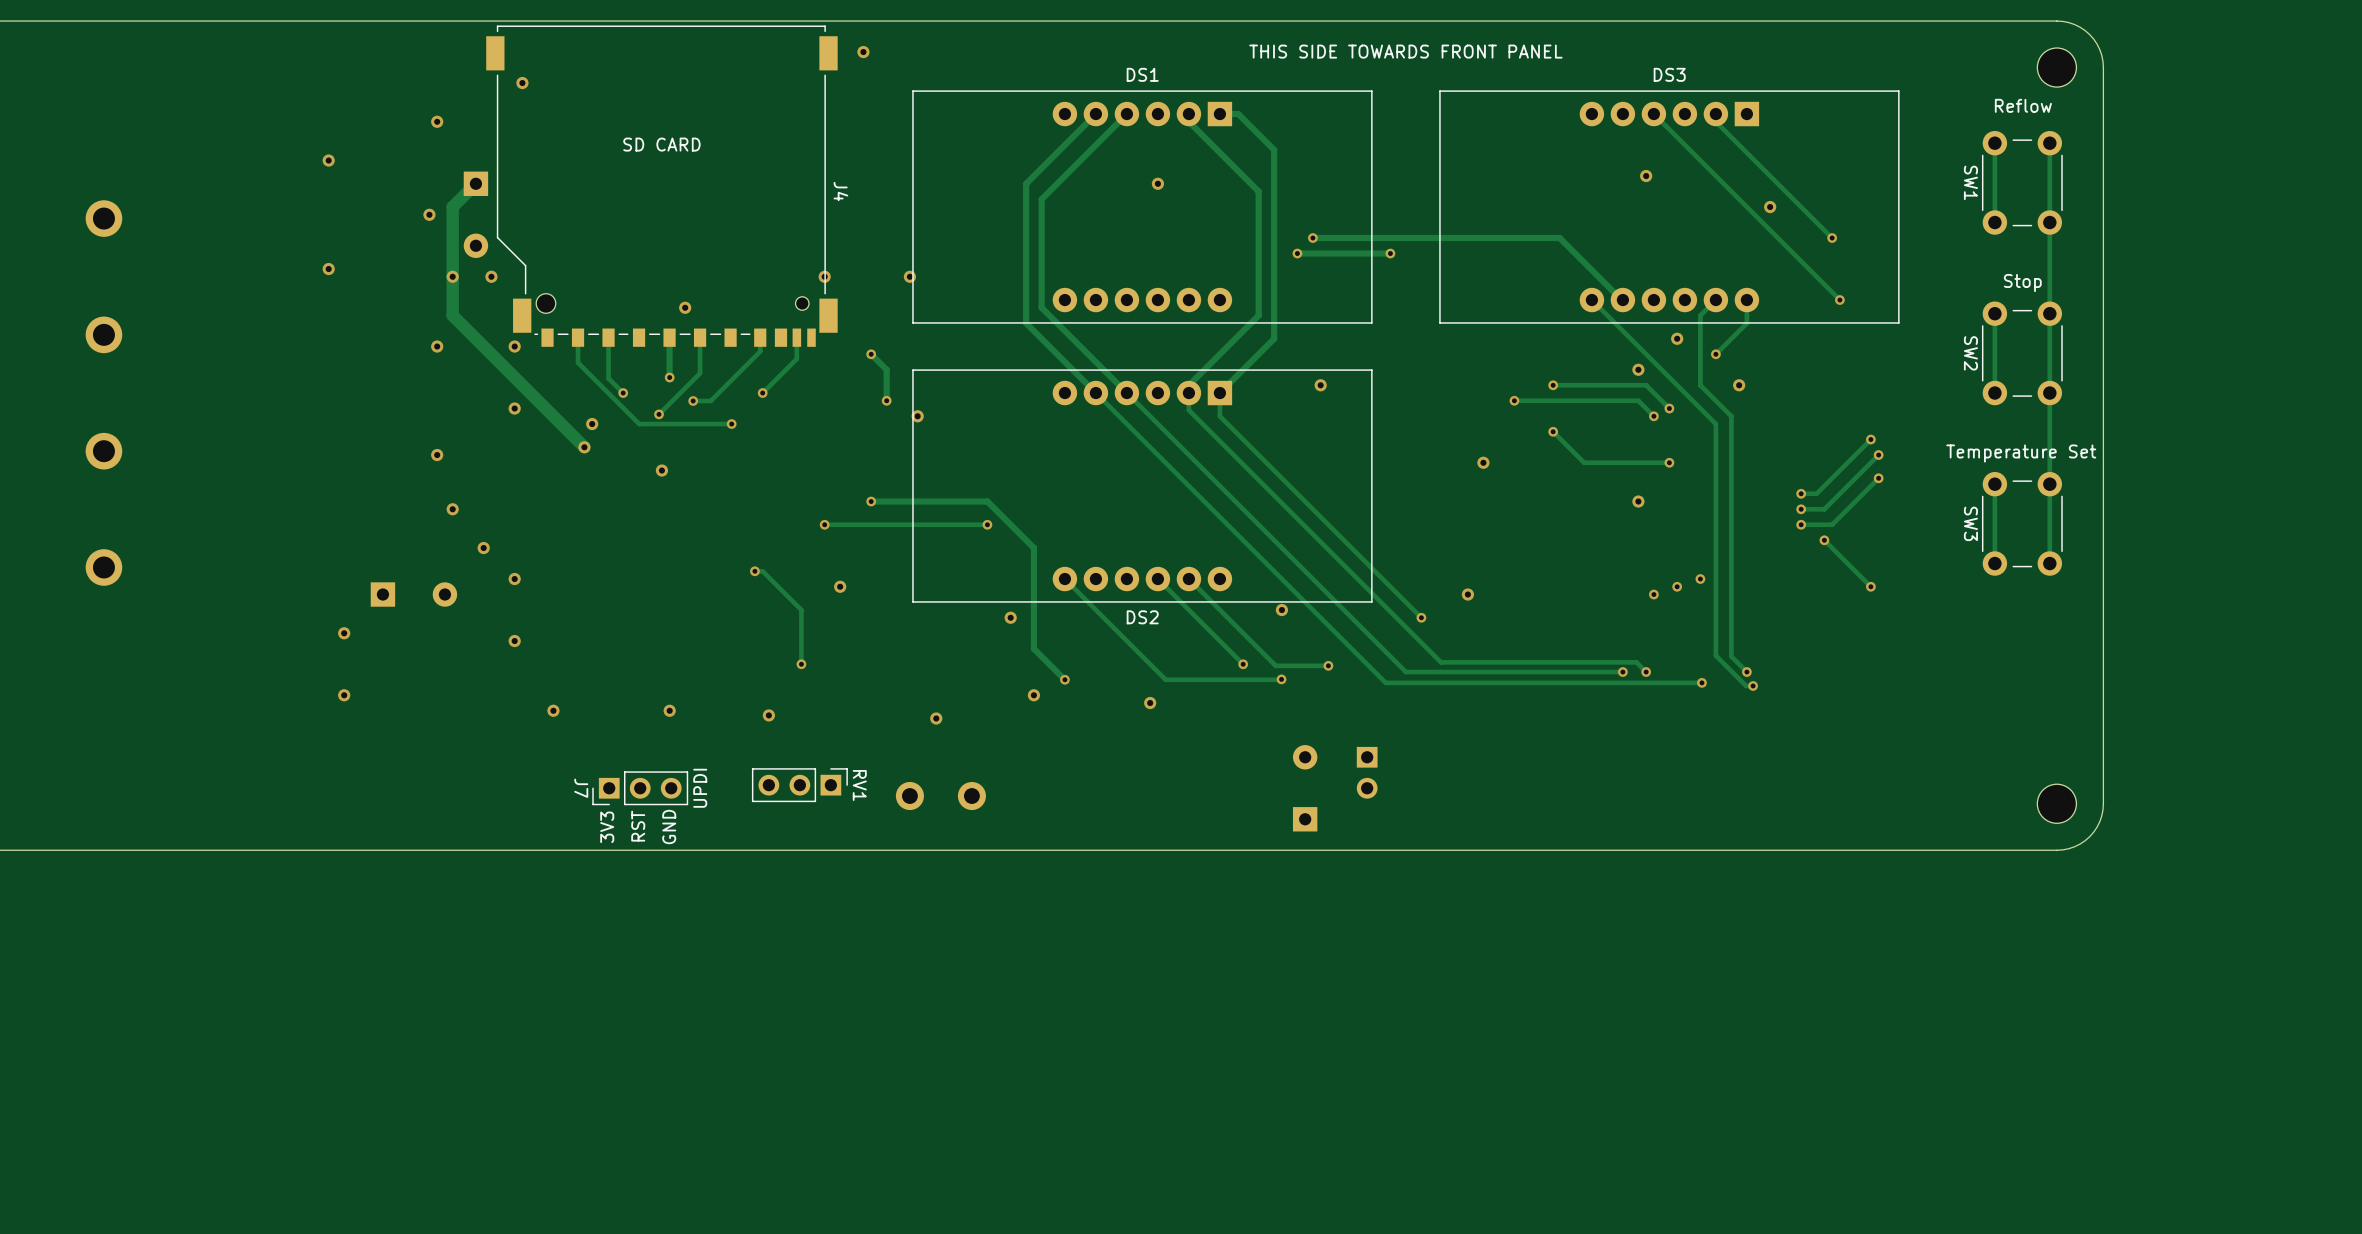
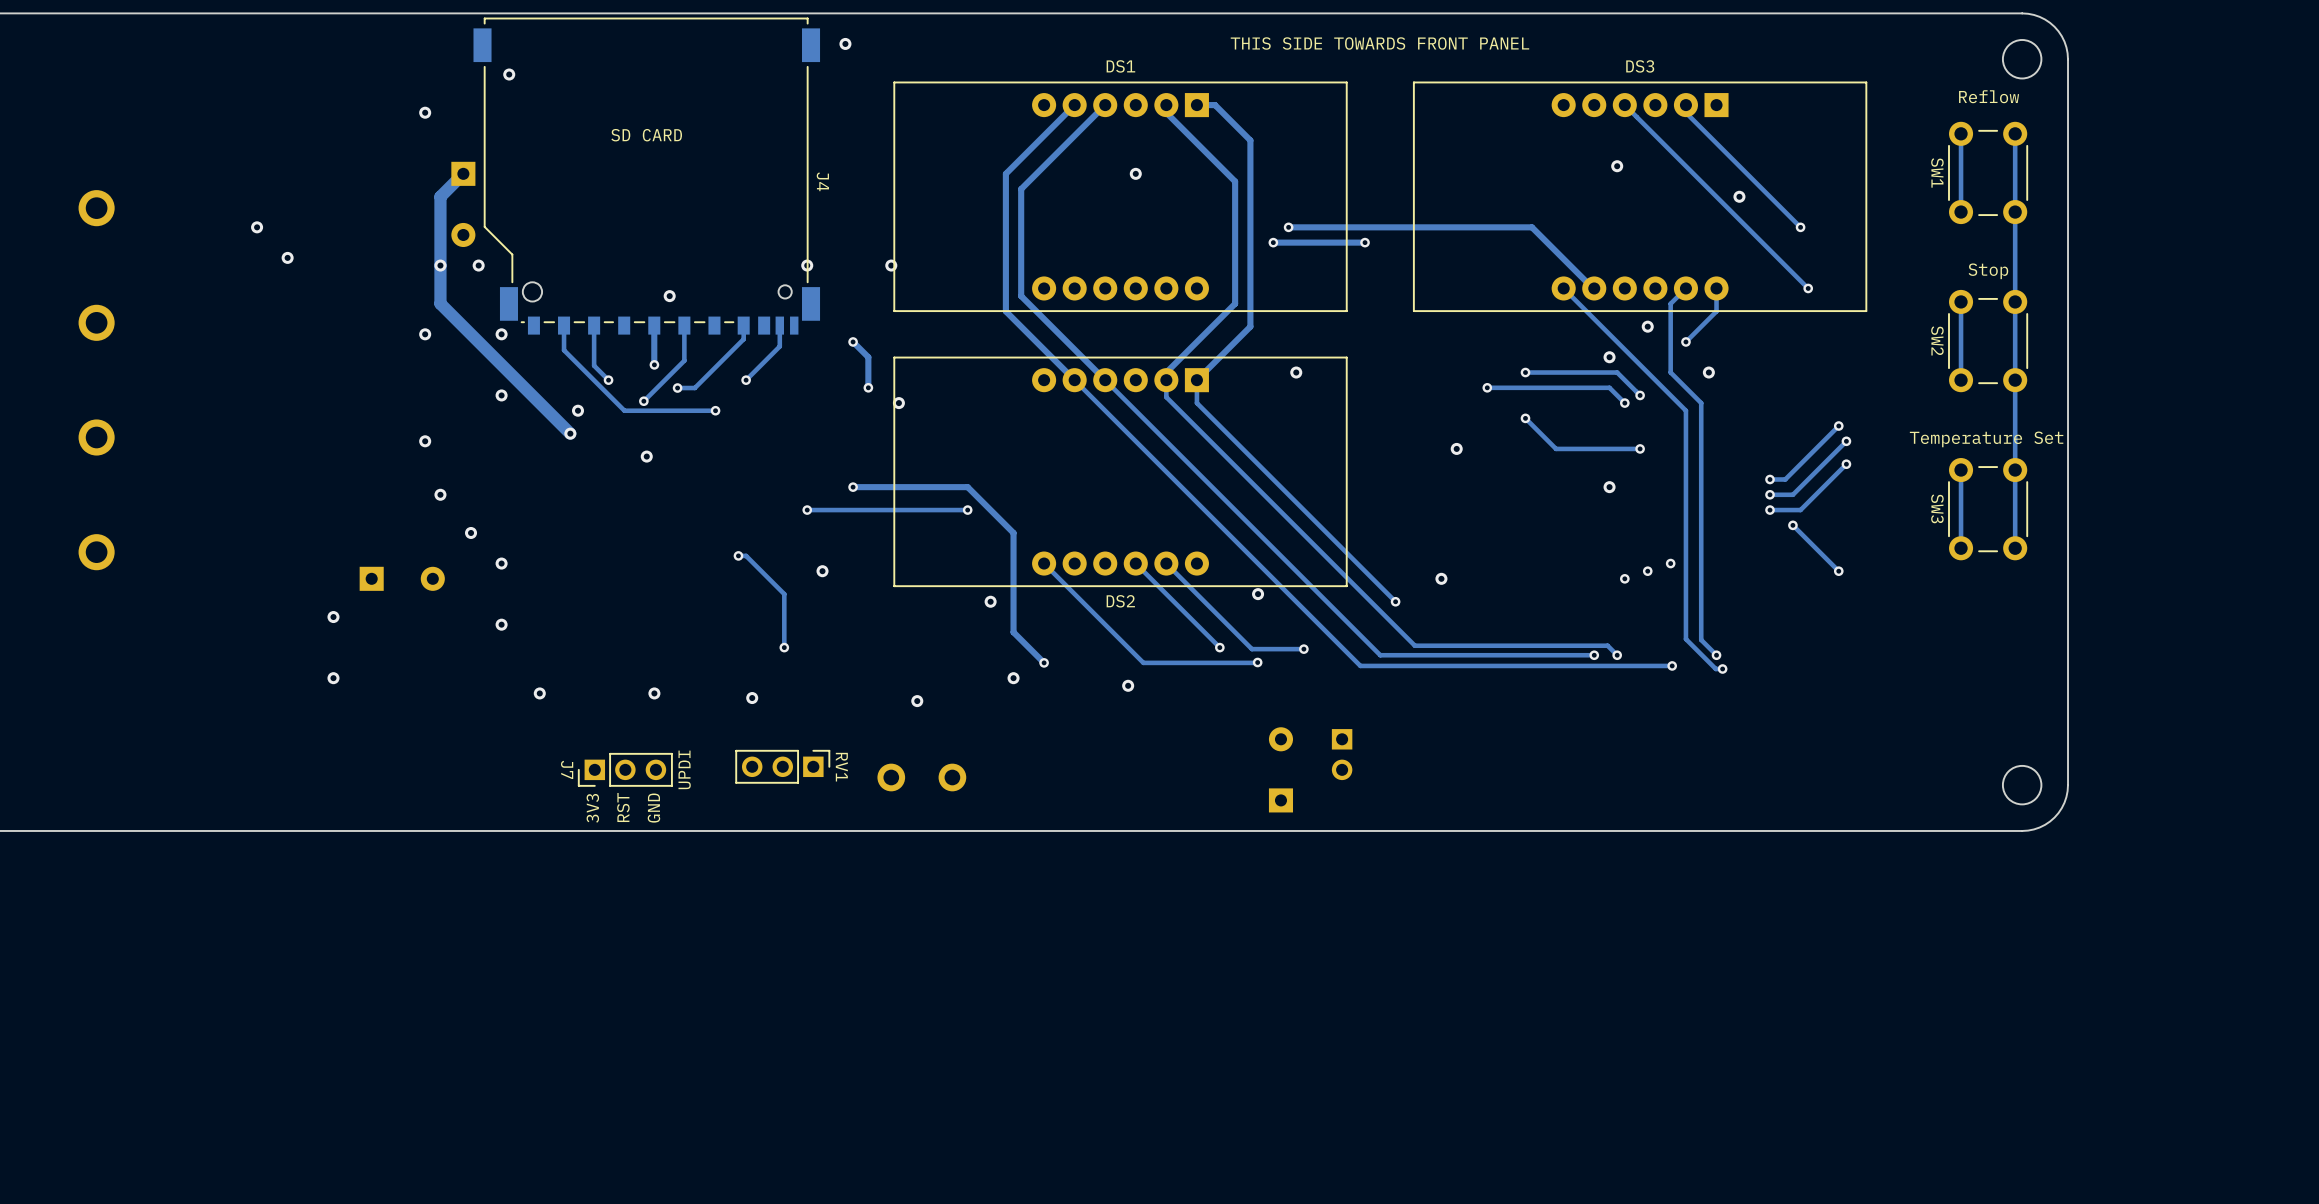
via: (328, 160) -> none
via: (429, 214) -> none
via: none -> (257, 227)
via position: (328, 269) -> (287, 257)

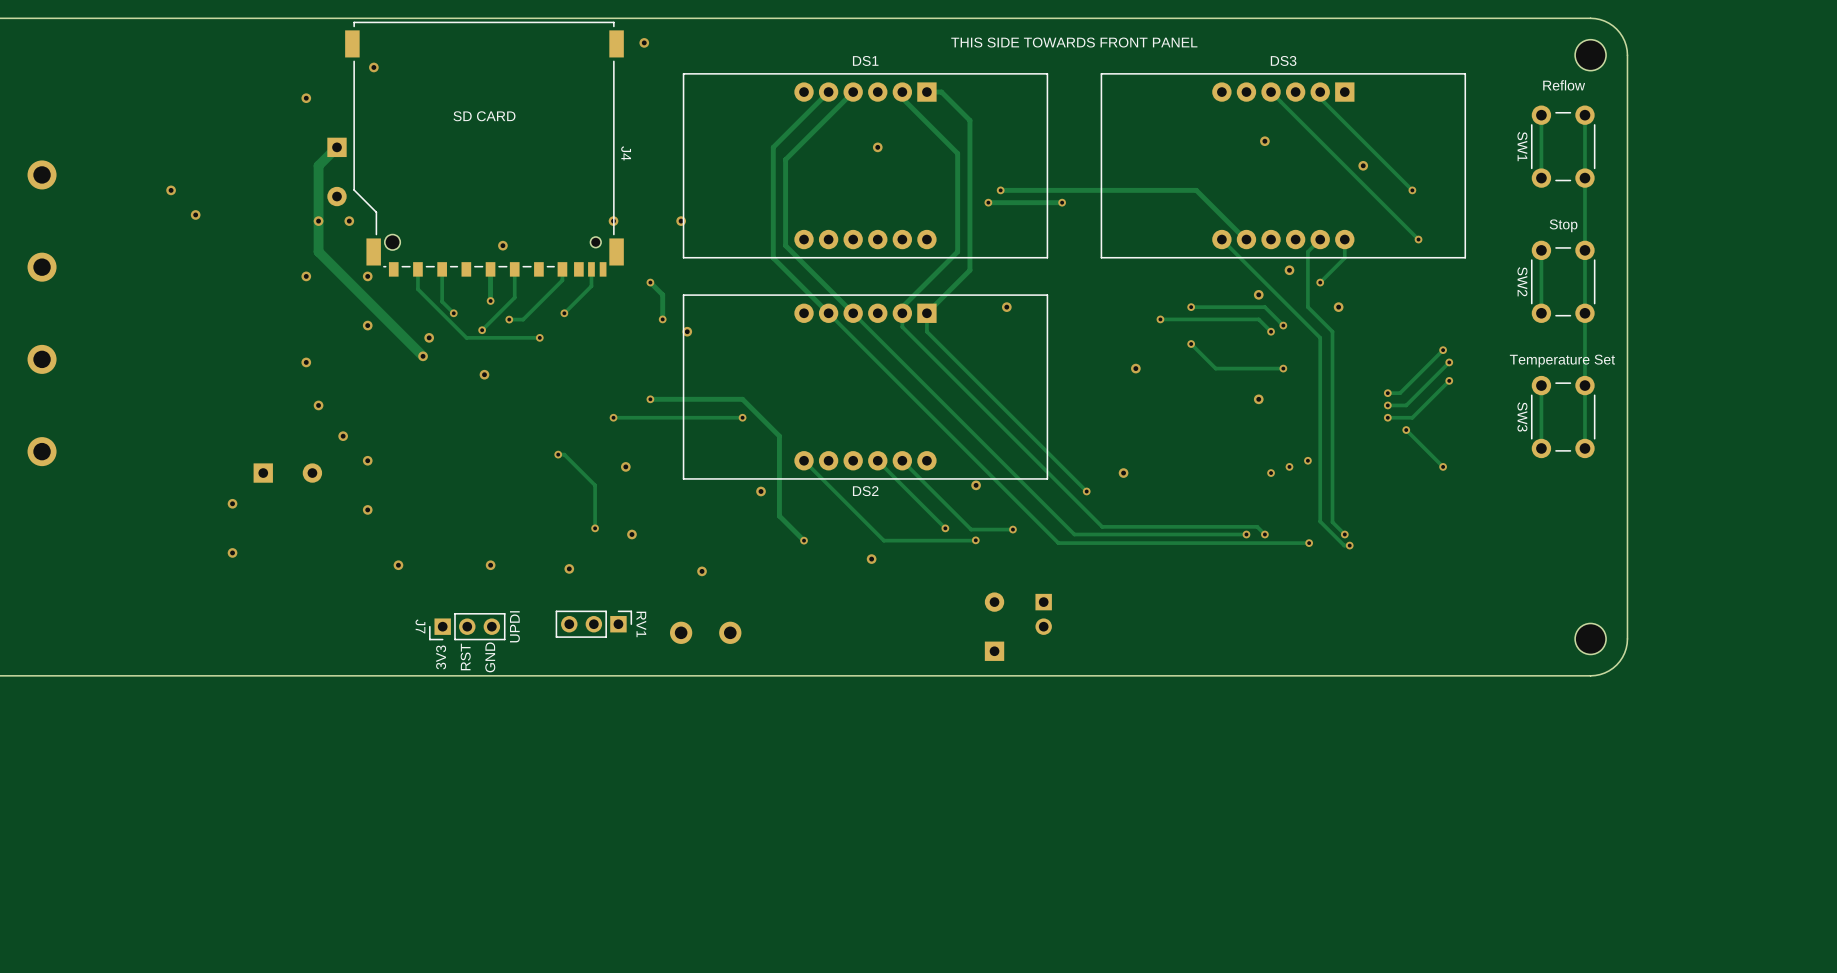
via: none -> (631, 534)
via: (1013, 678) -> none

